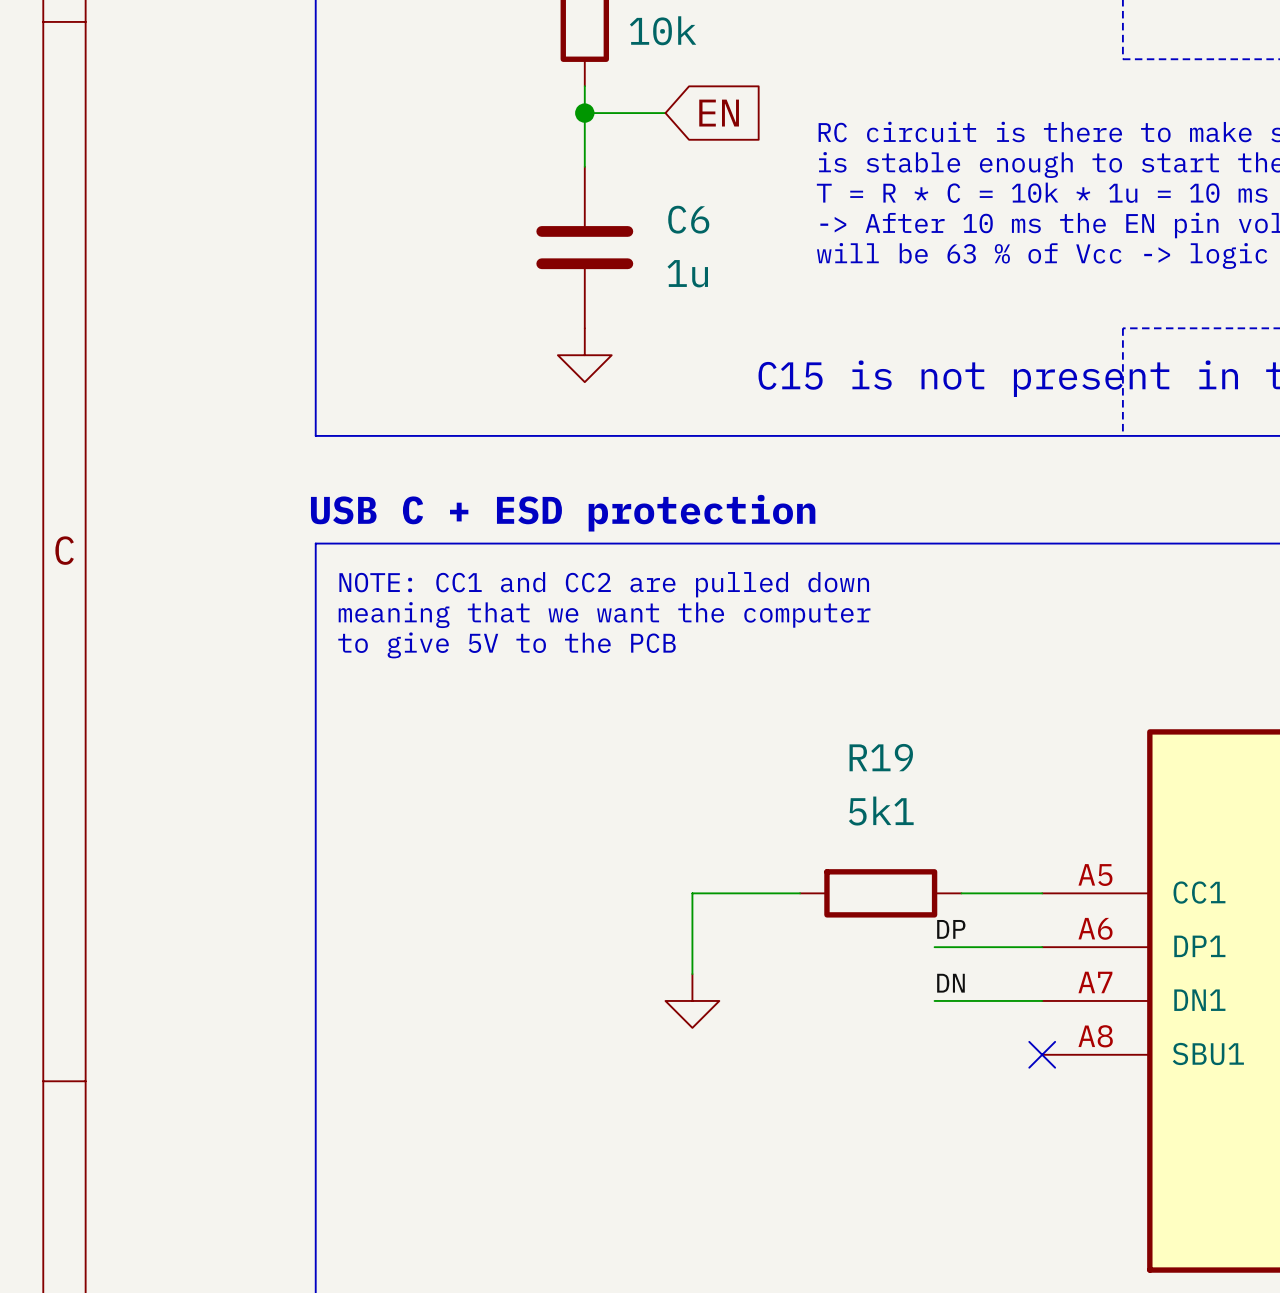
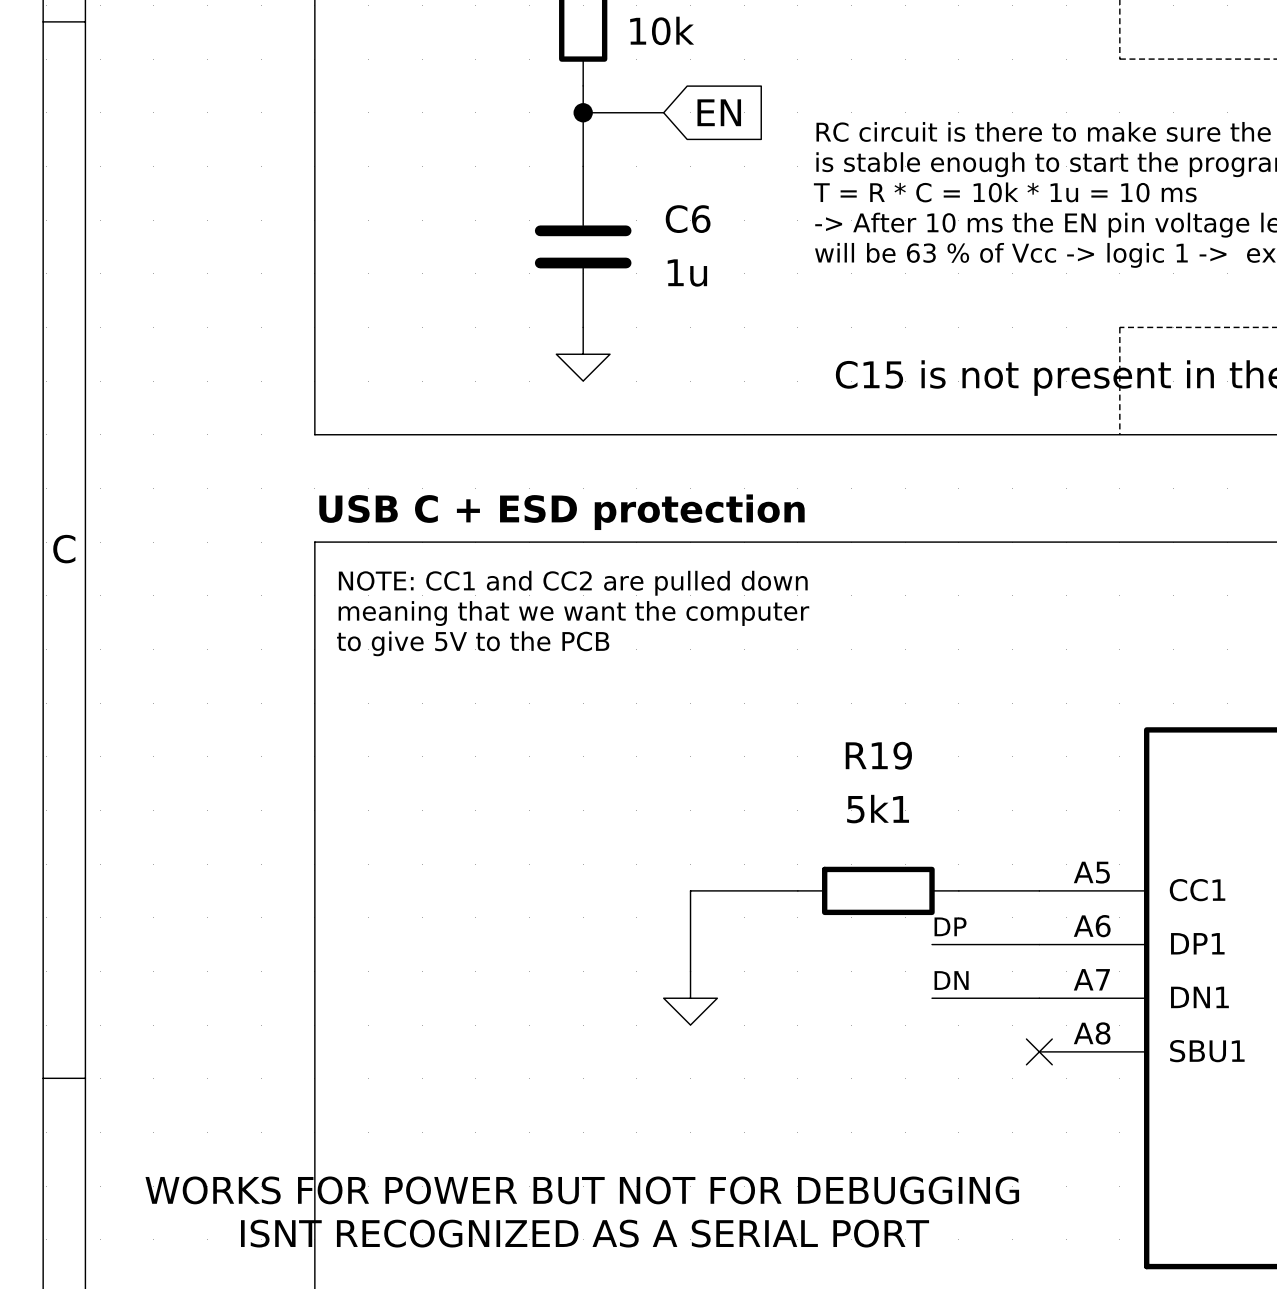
text: none -> WORKS FOR POWER BUT NOT FOR DEBUGGING (582, 1190)
text: none -> ISNT RECOGNIZED AS A SERIAL PORT (585, 1233)

